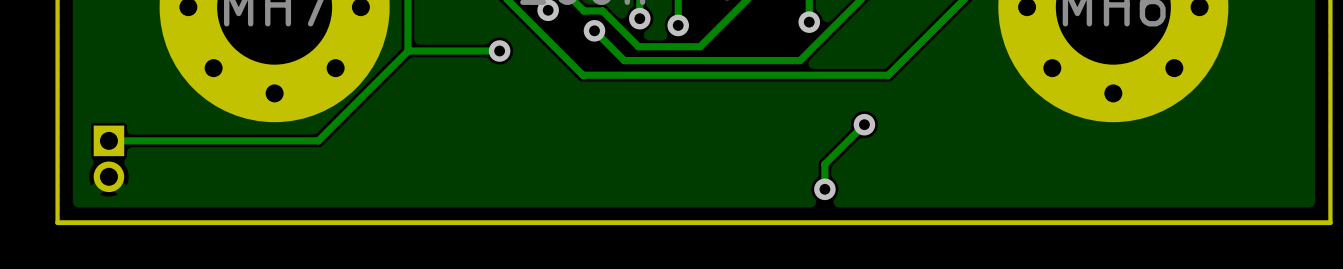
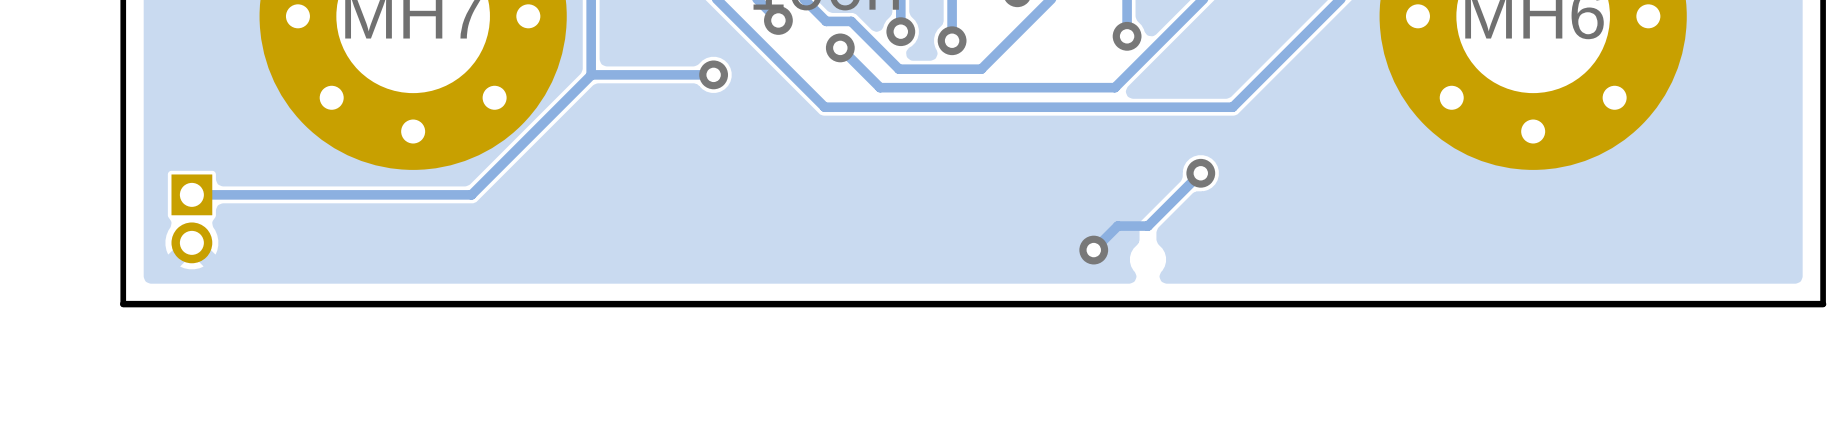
track: (824, 164) (824, 189) -> (1147, 226) (1117, 226) (1093, 250)
via position: (824, 189) -> (1093, 250)

